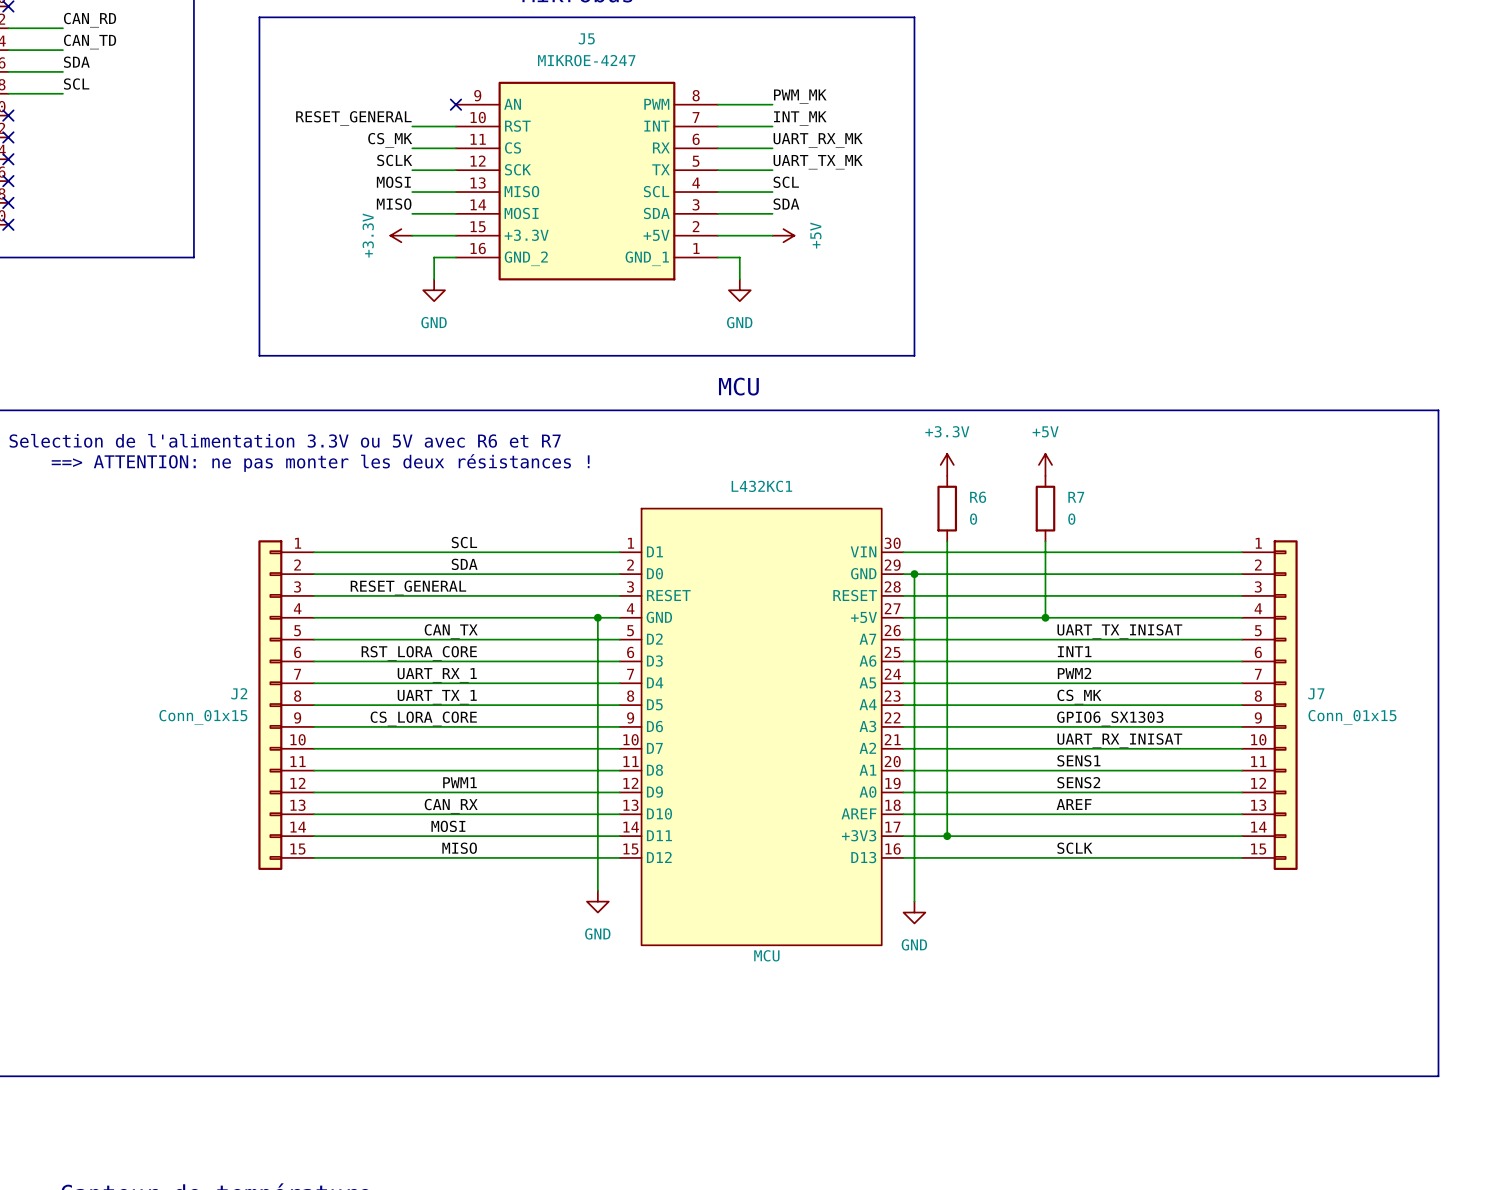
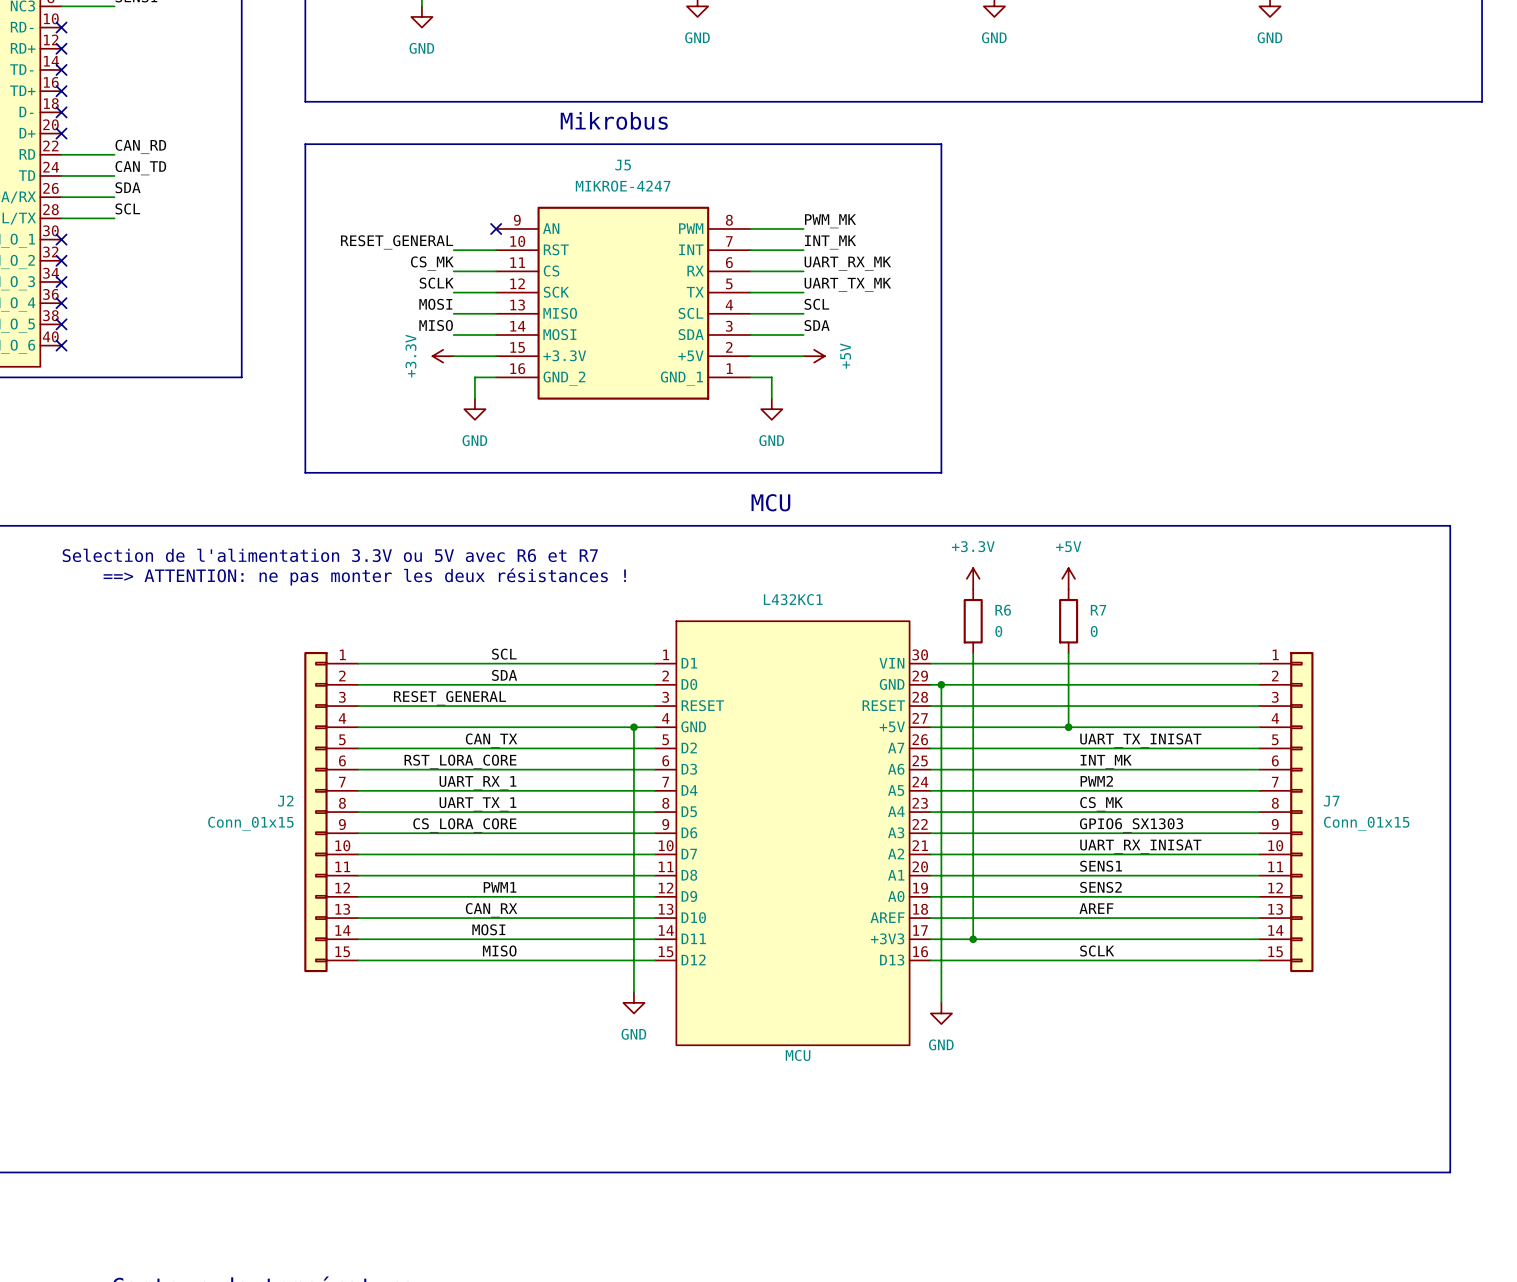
label: INT1 (1074, 651) -> INT_MK (1106, 761)

